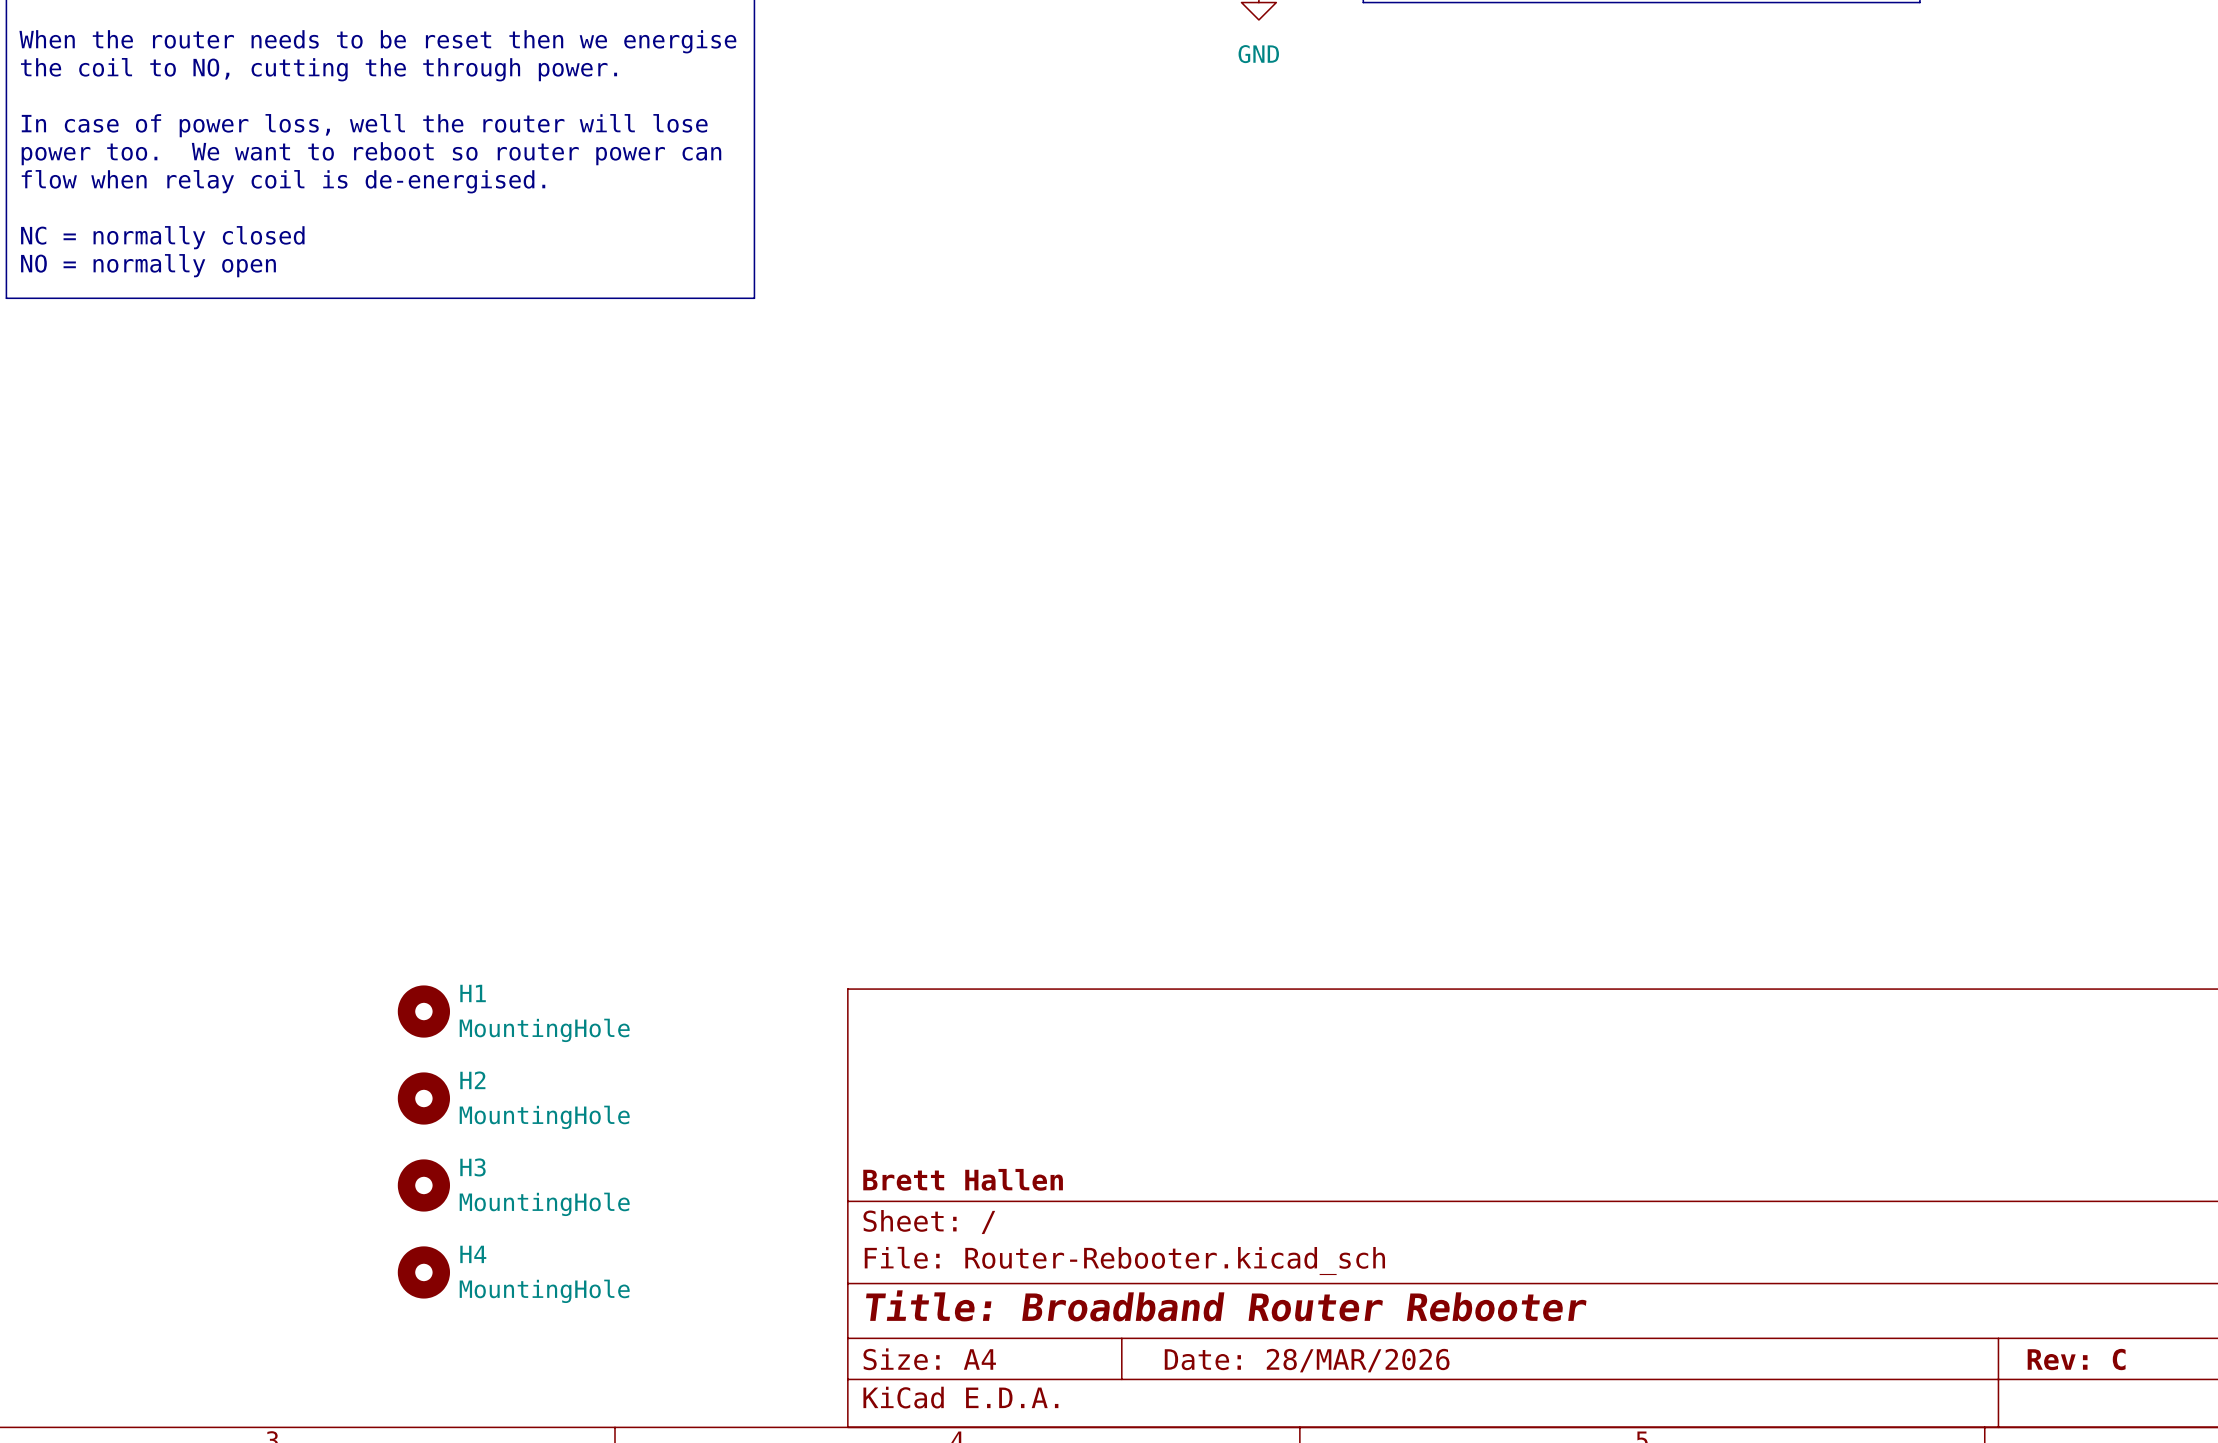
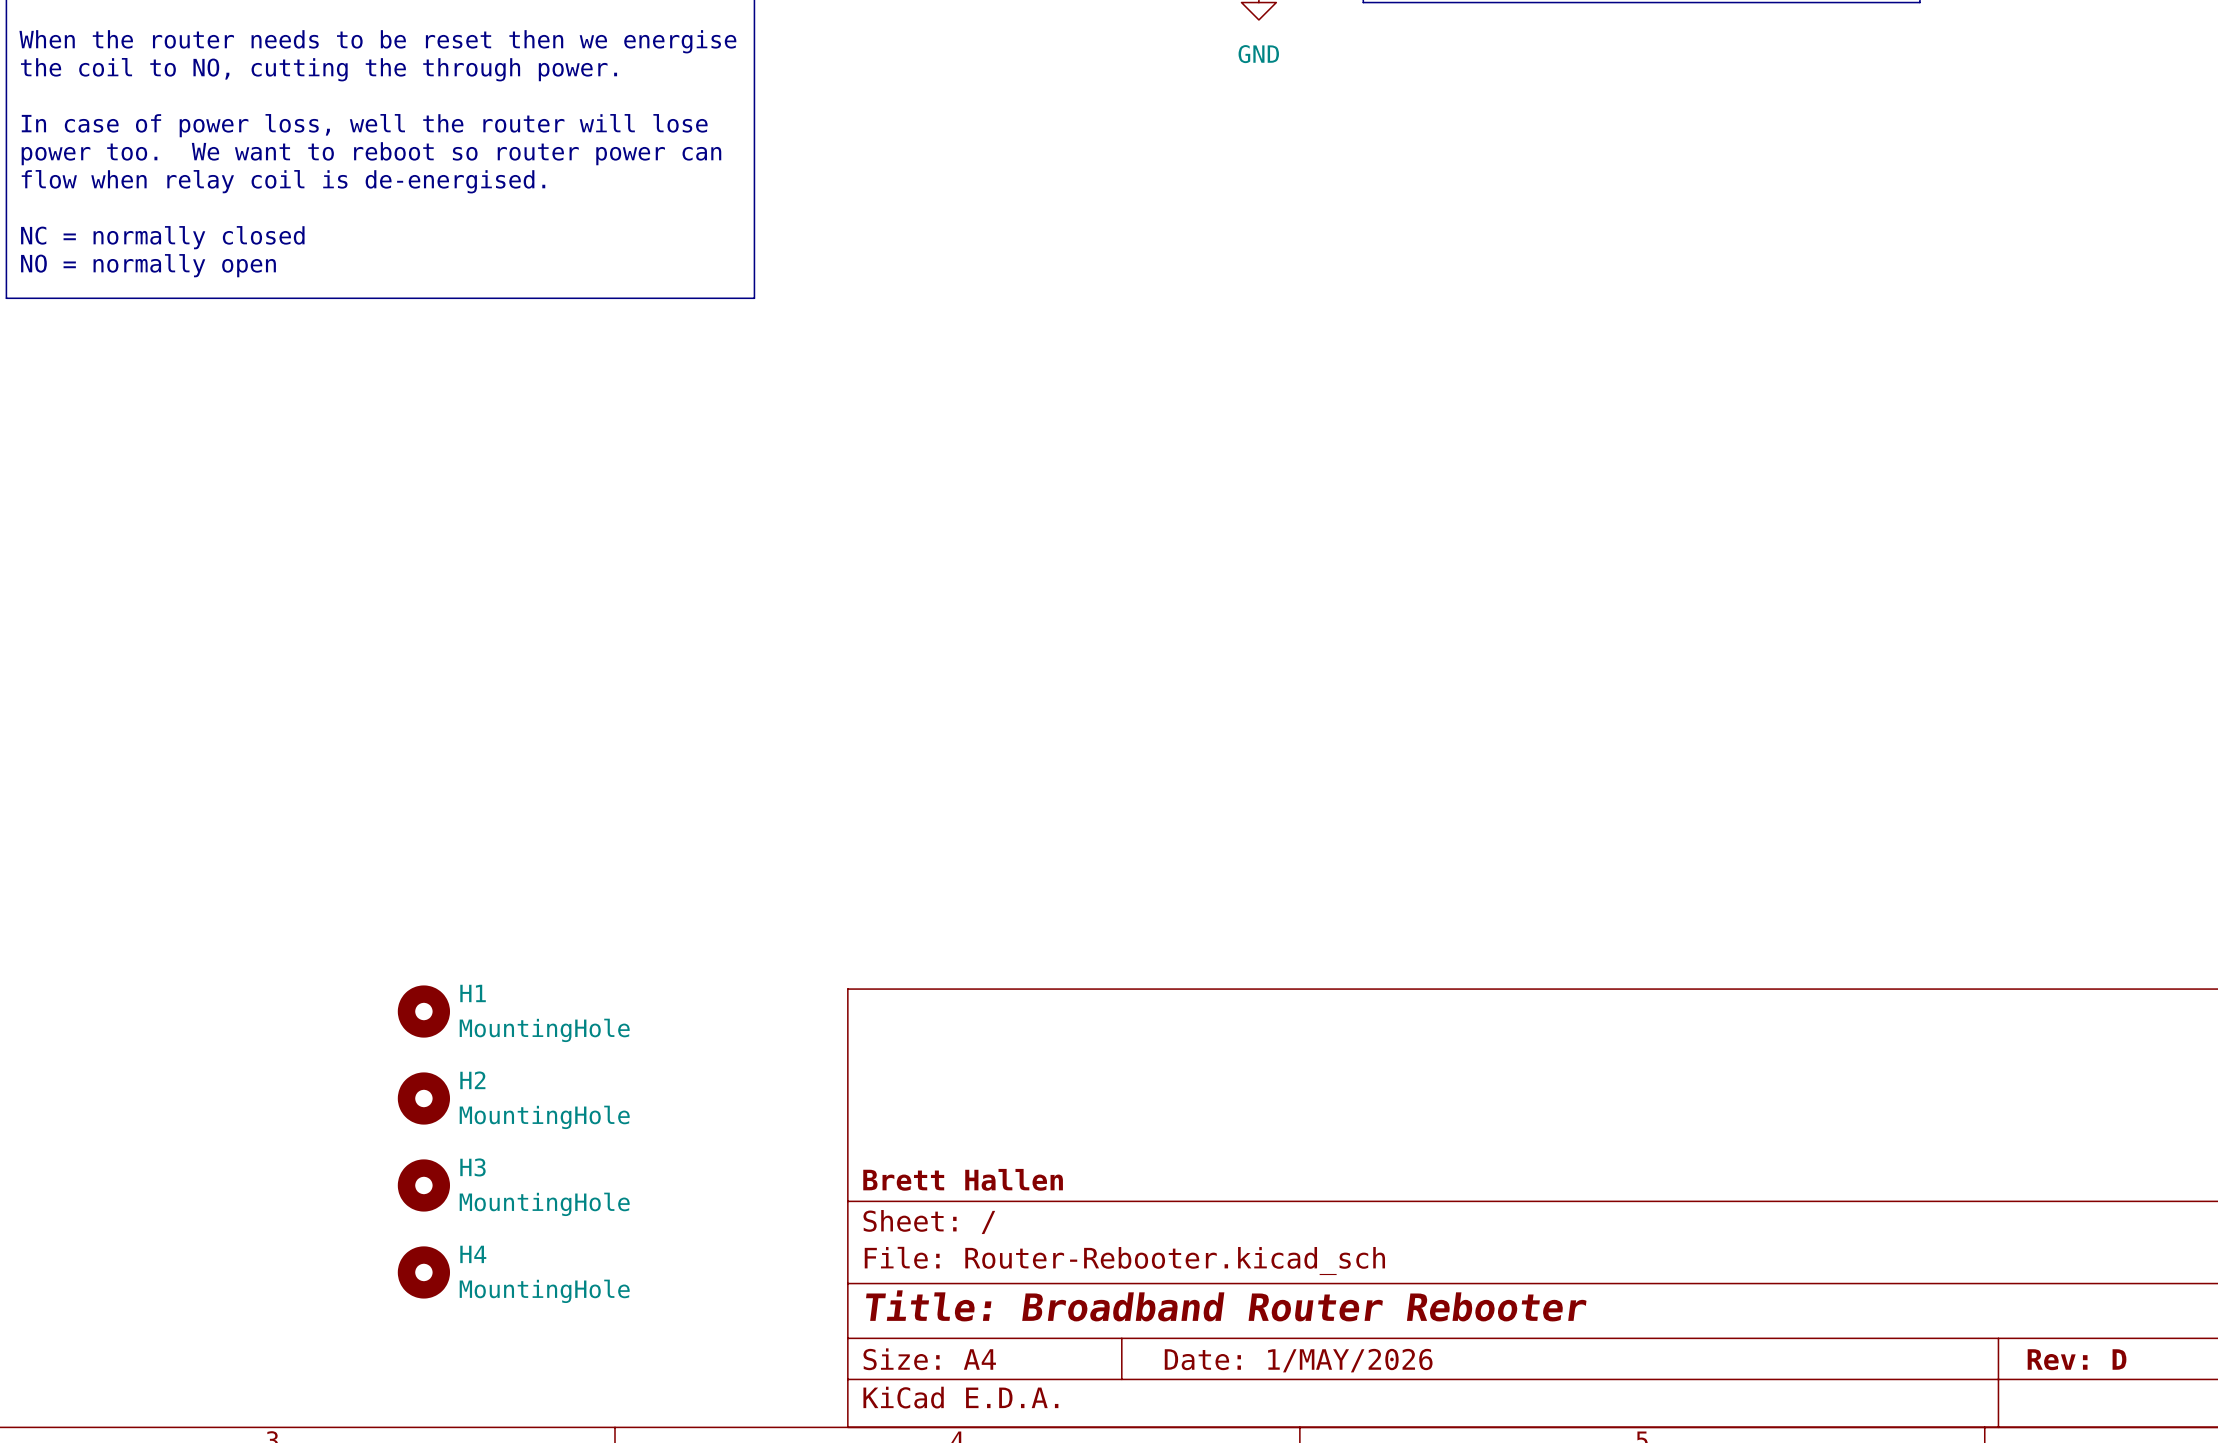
title block: Rev: C (2076, 1359) -> Rev: D (2077, 1359)
title block: Date: 28/MAR/2026 (1307, 1360) -> Date: 1/MAY/2026 (1298, 1360)

